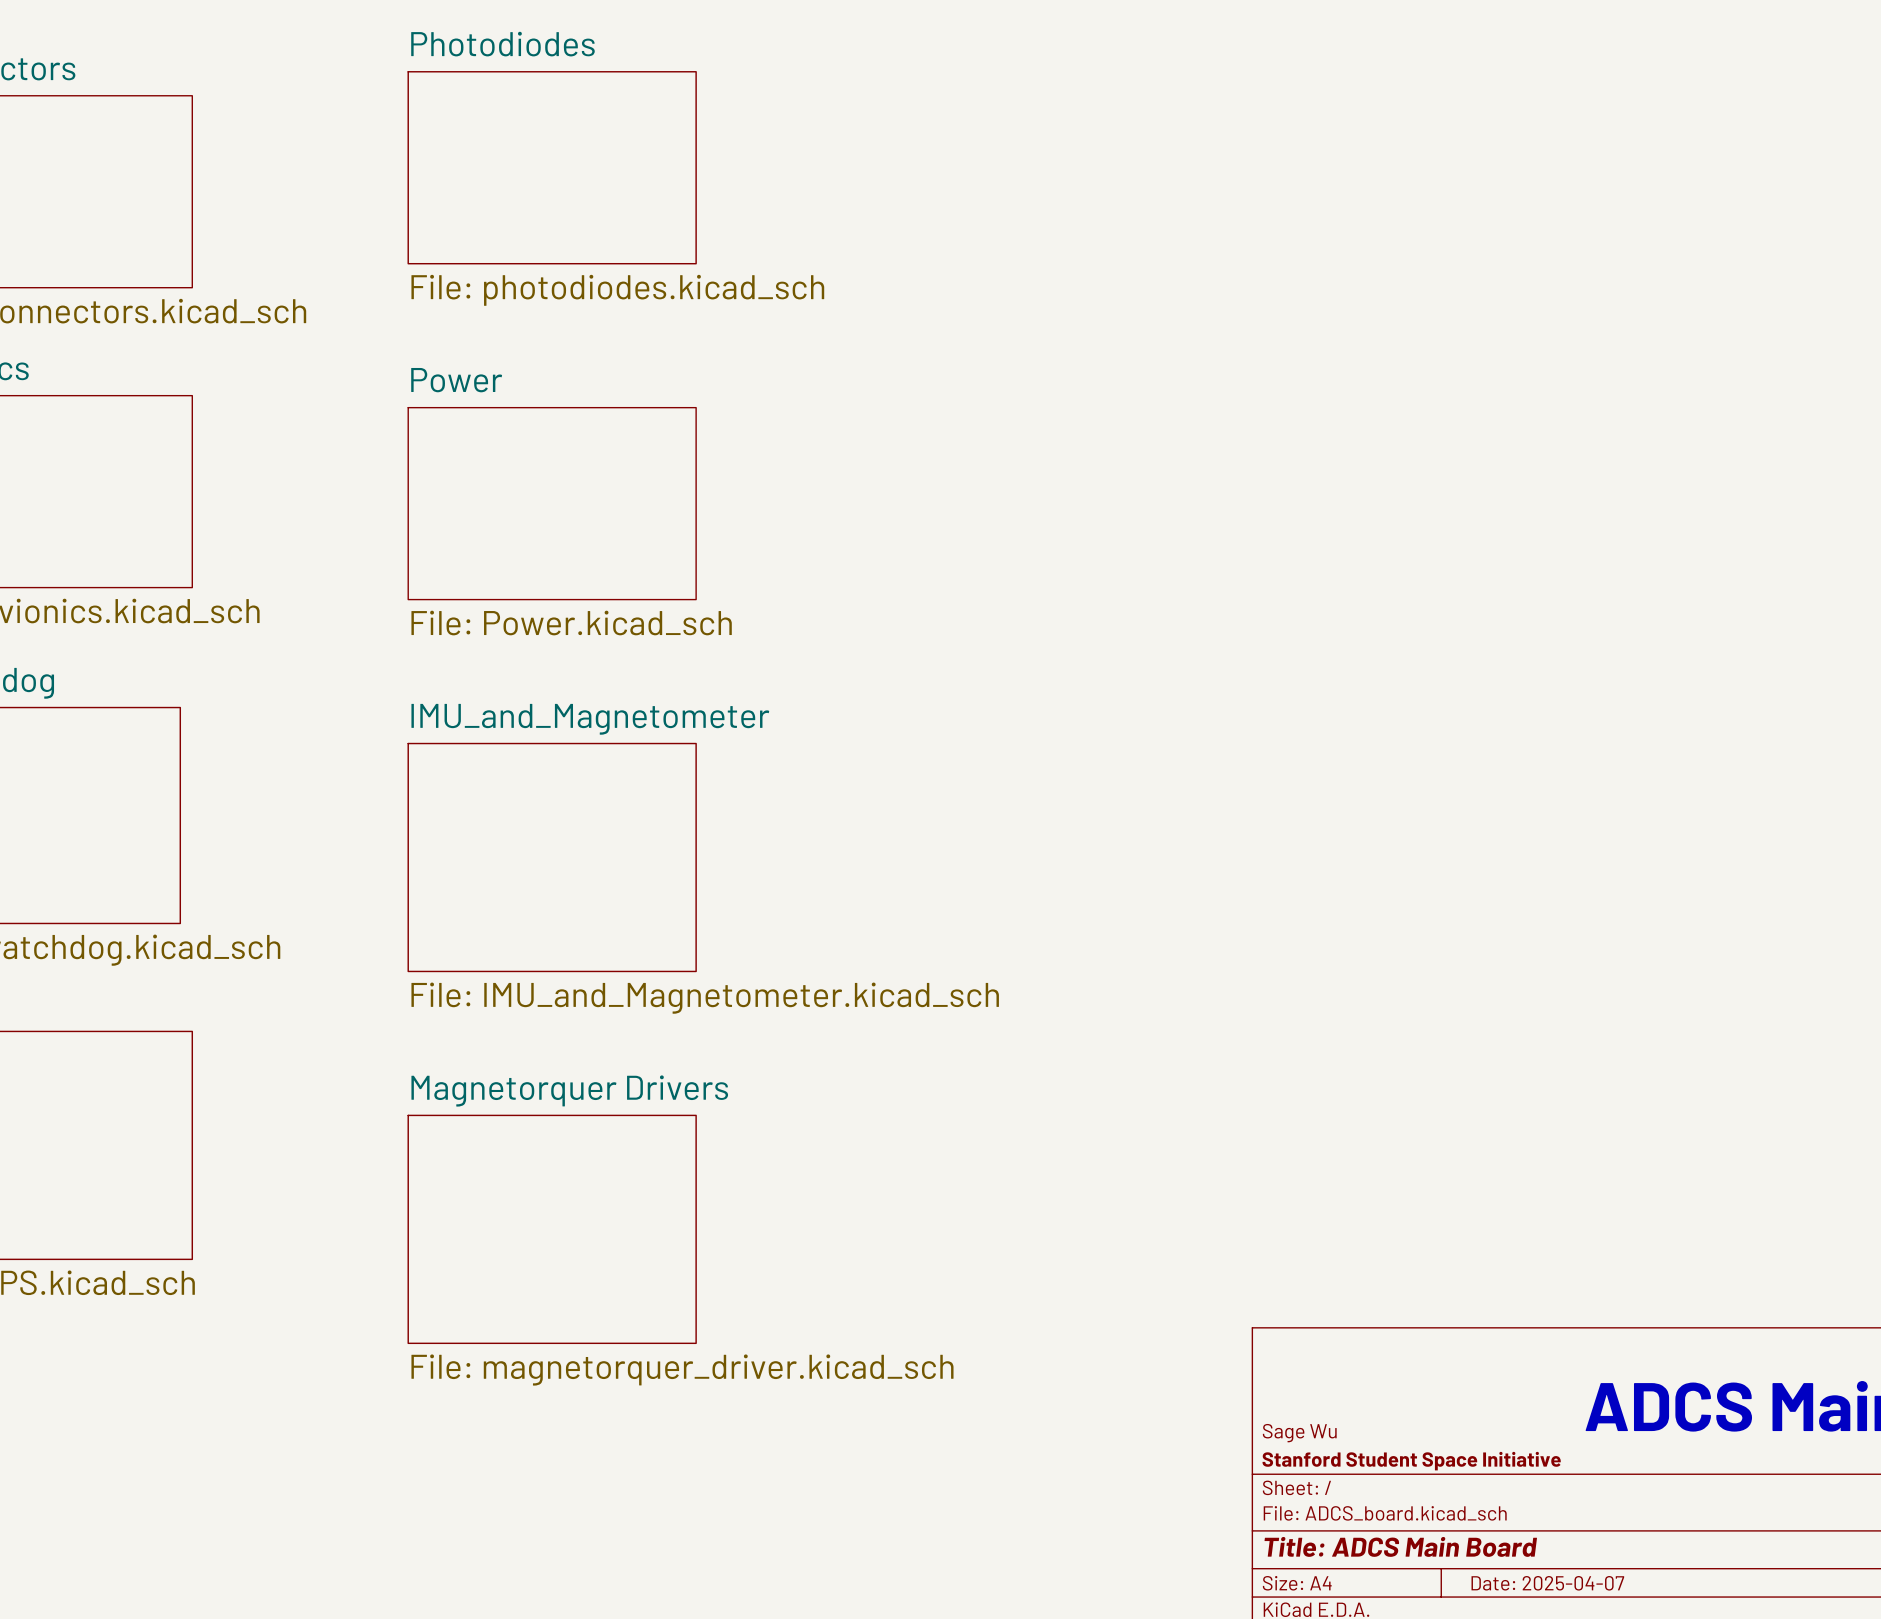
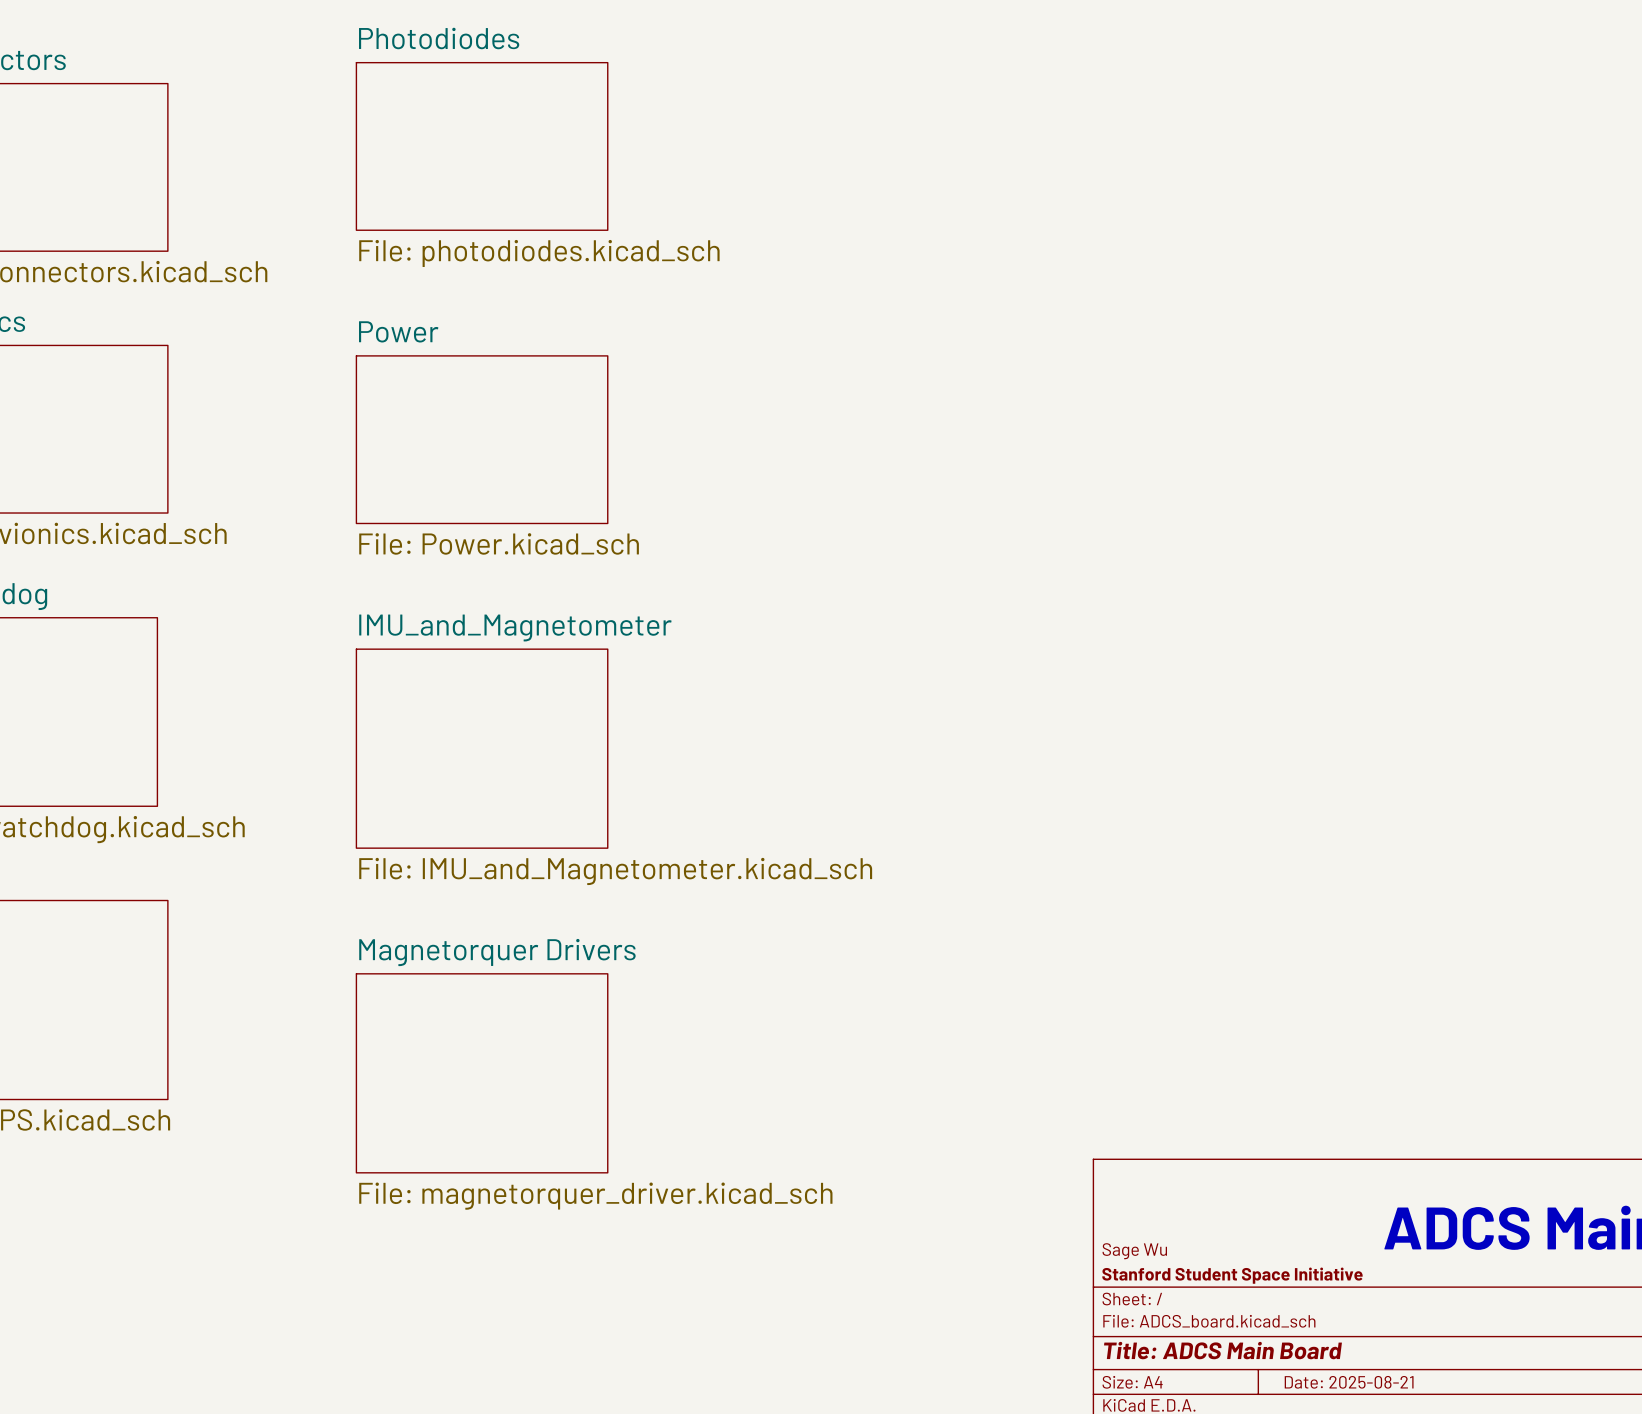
title block: Date: 2025-04-07 (1547, 1583) -> Date: 2025-08-21 (1349, 1382)

